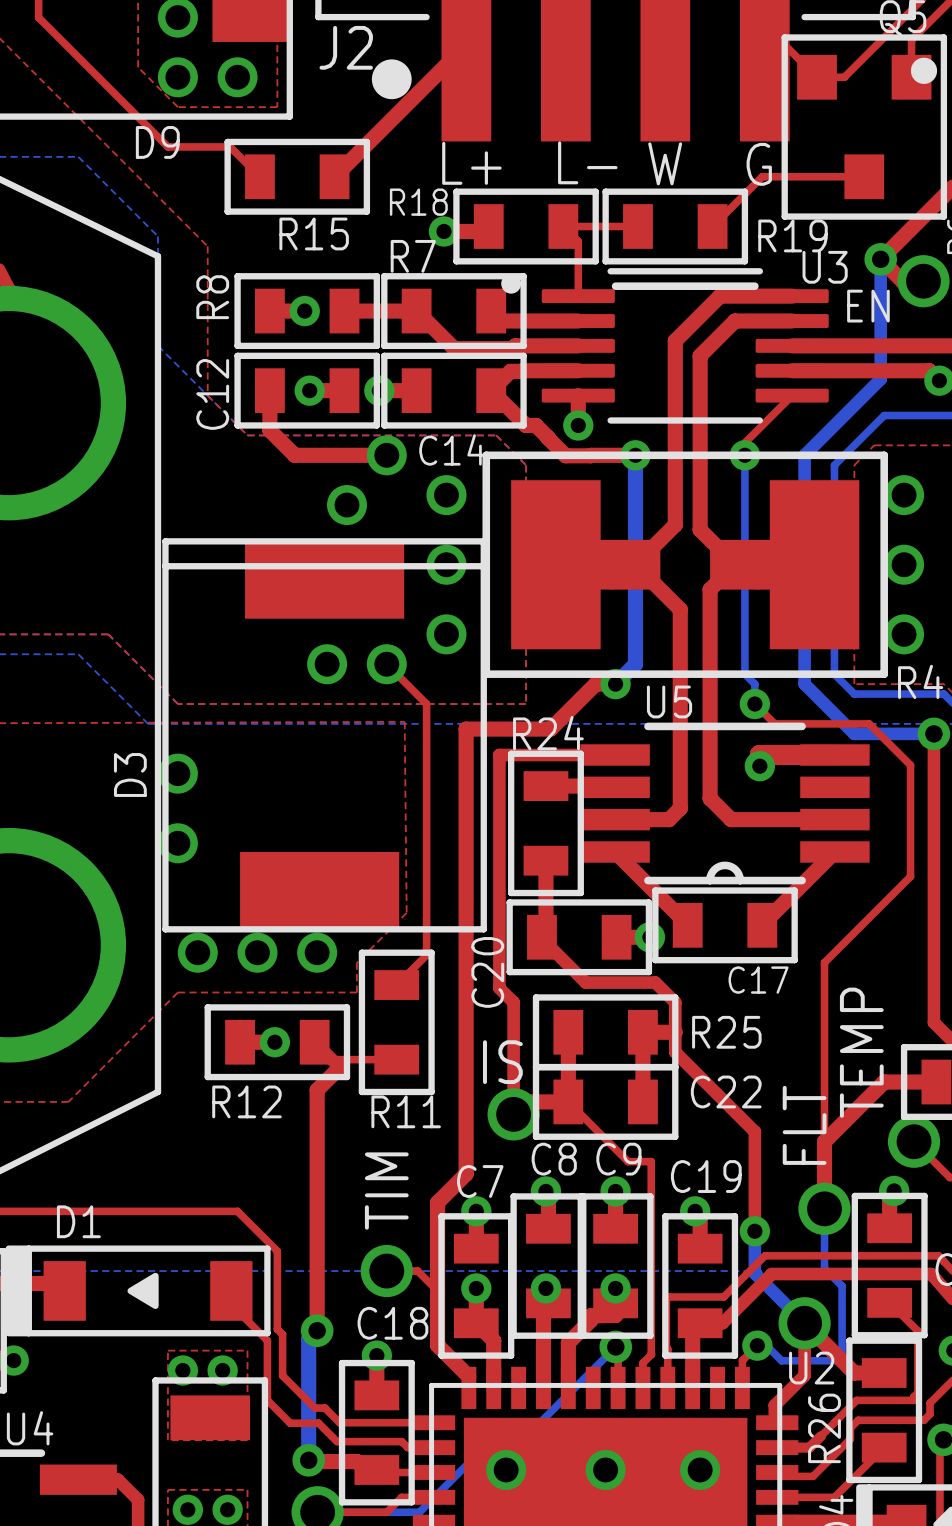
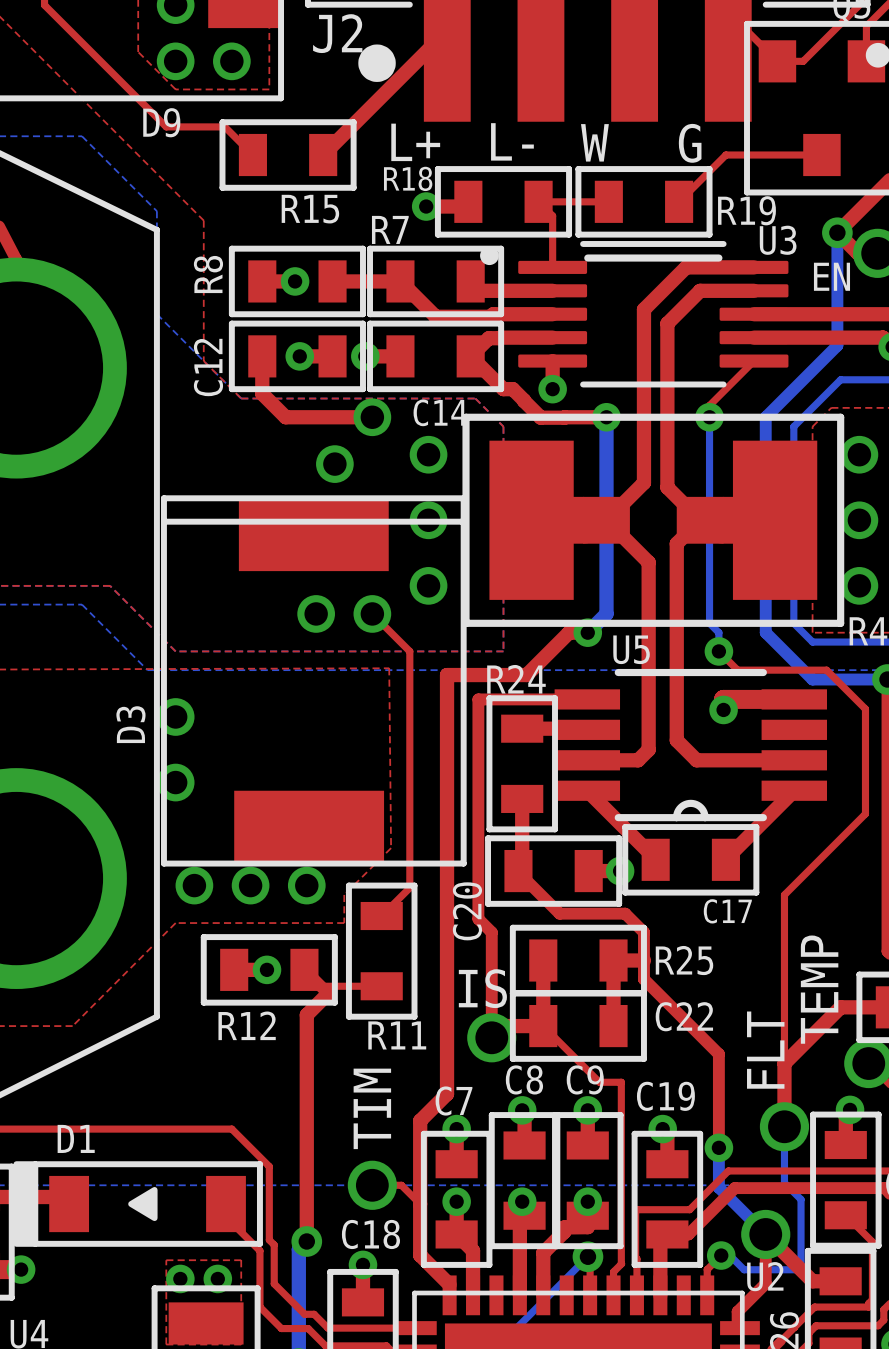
text position: L- (587, 162) -> L- (512, 141)
text position: L+ (471, 163) -> L+ (415, 142)
text position: W (665, 163) -> W (594, 142)
text position: G (759, 164) -> G (690, 143)

